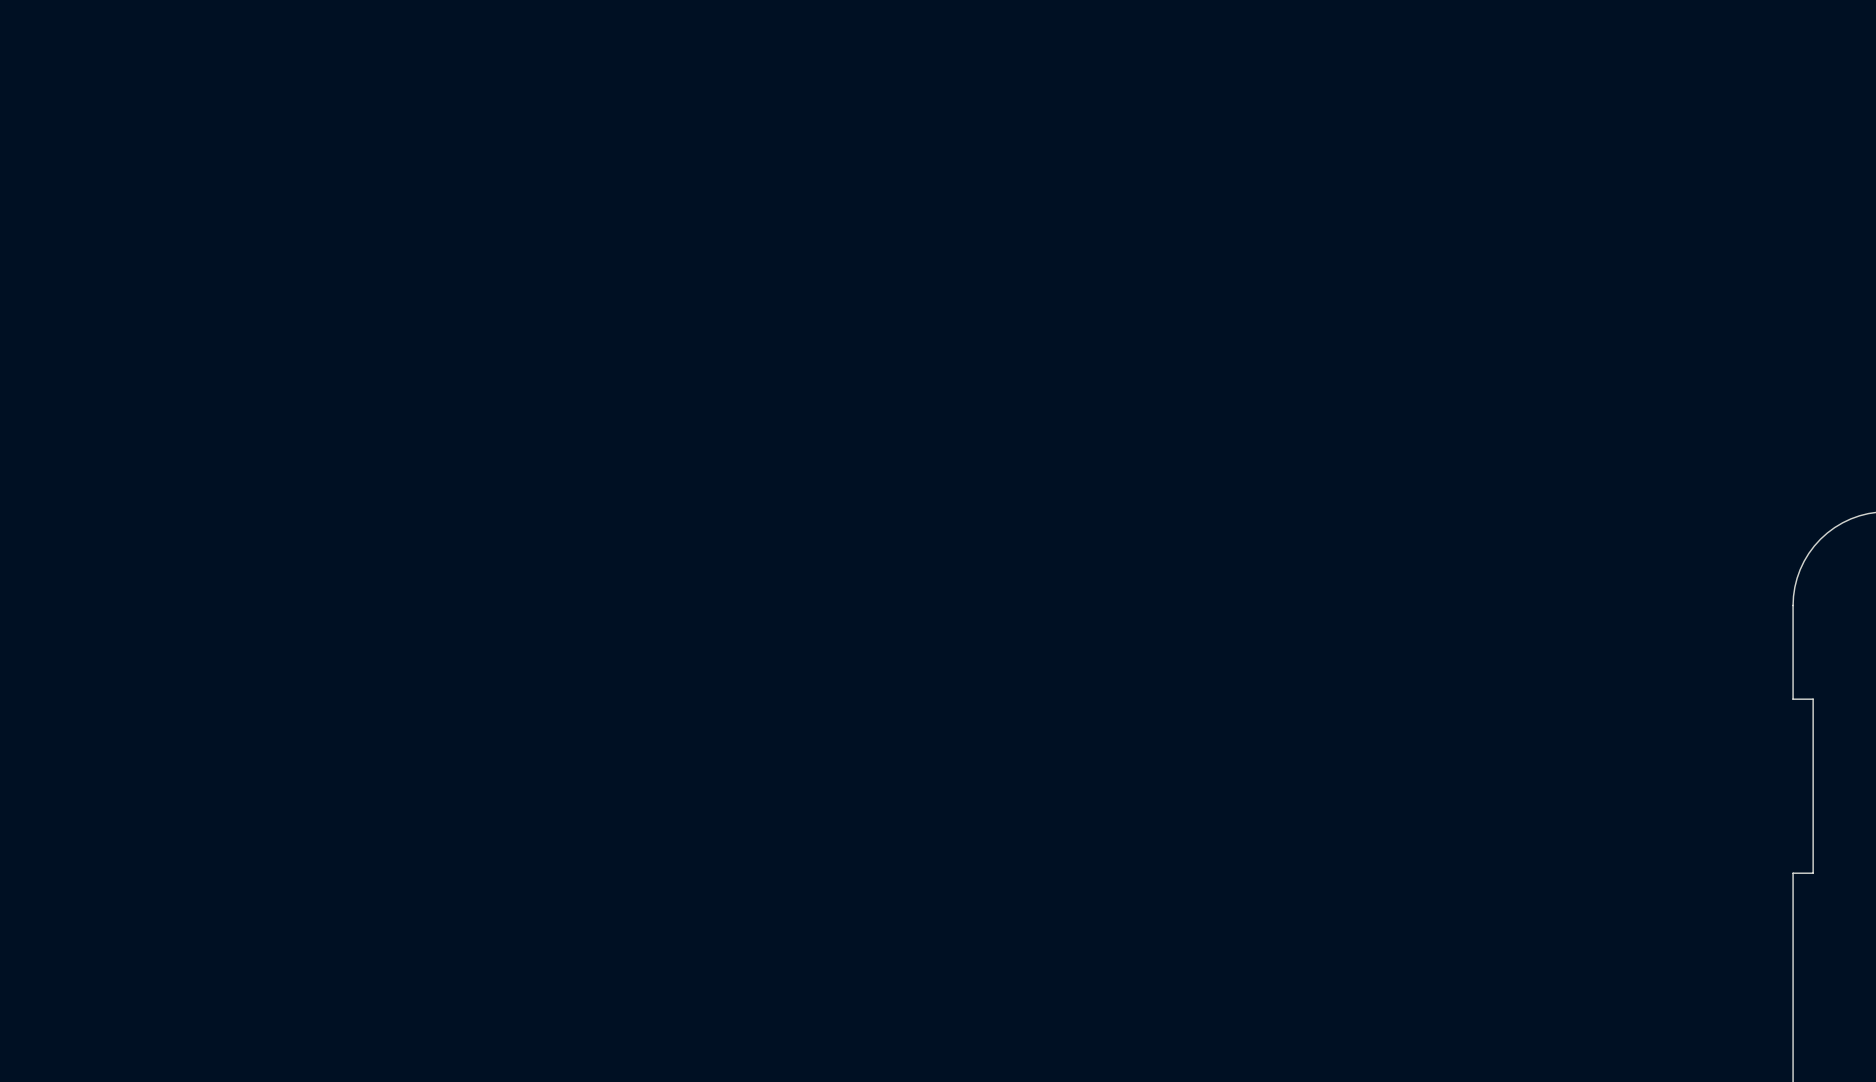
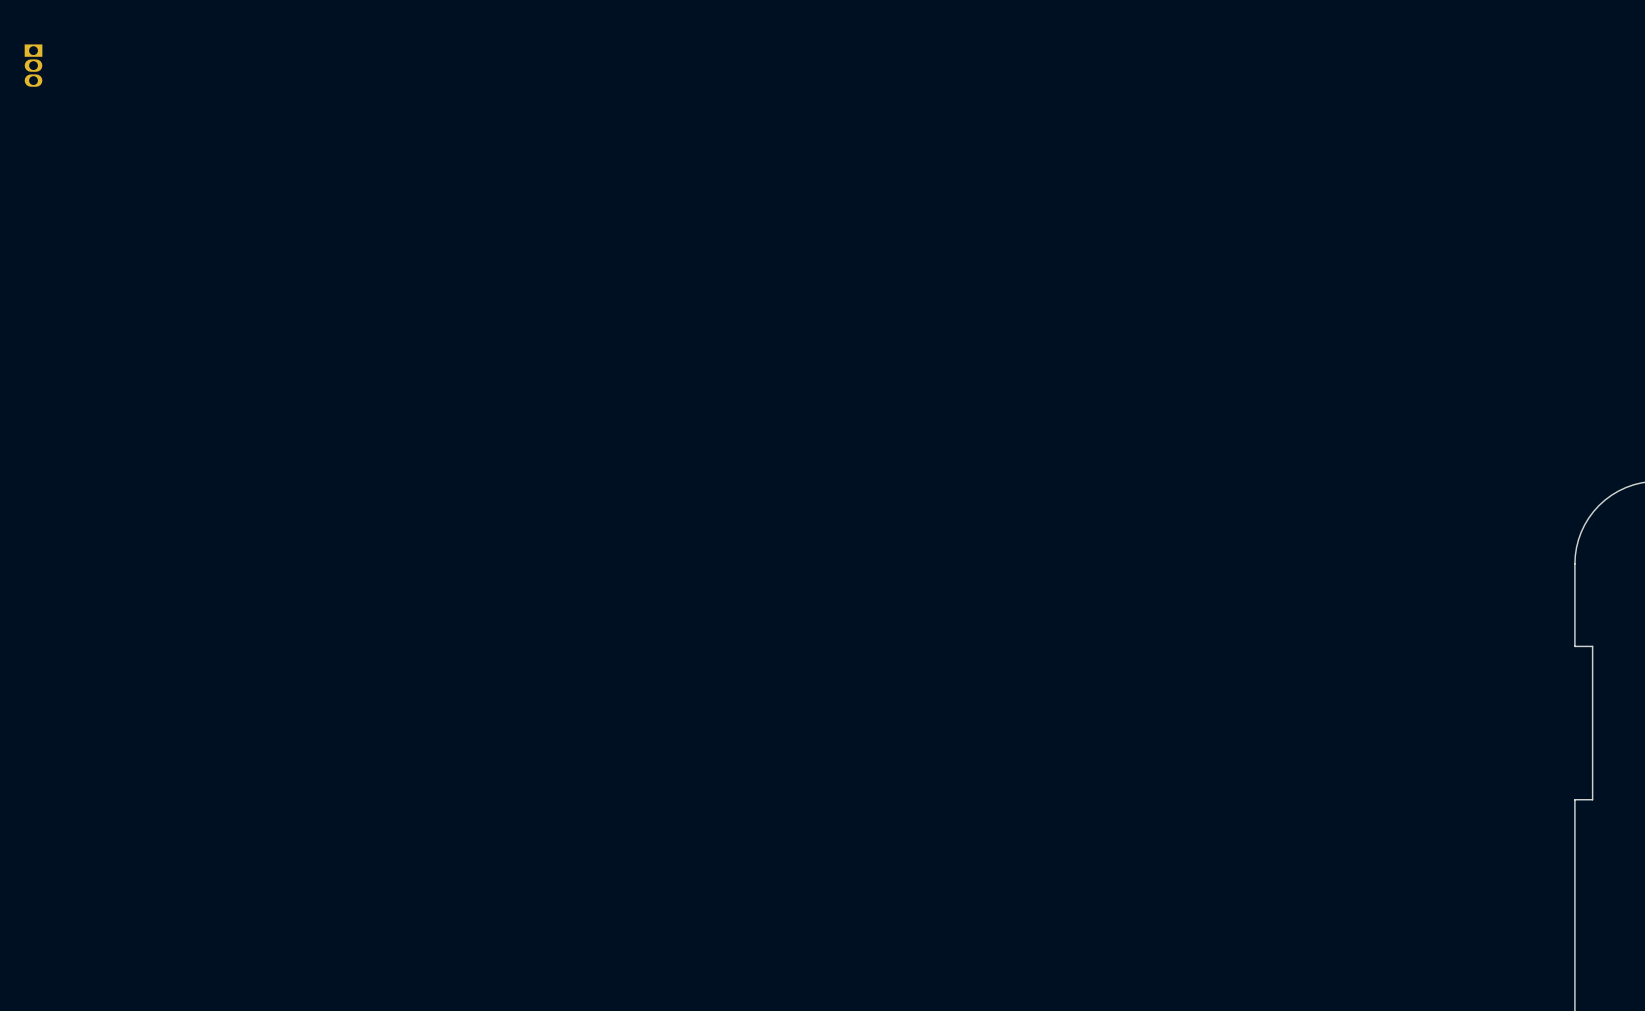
part: none -> (33, 65)

